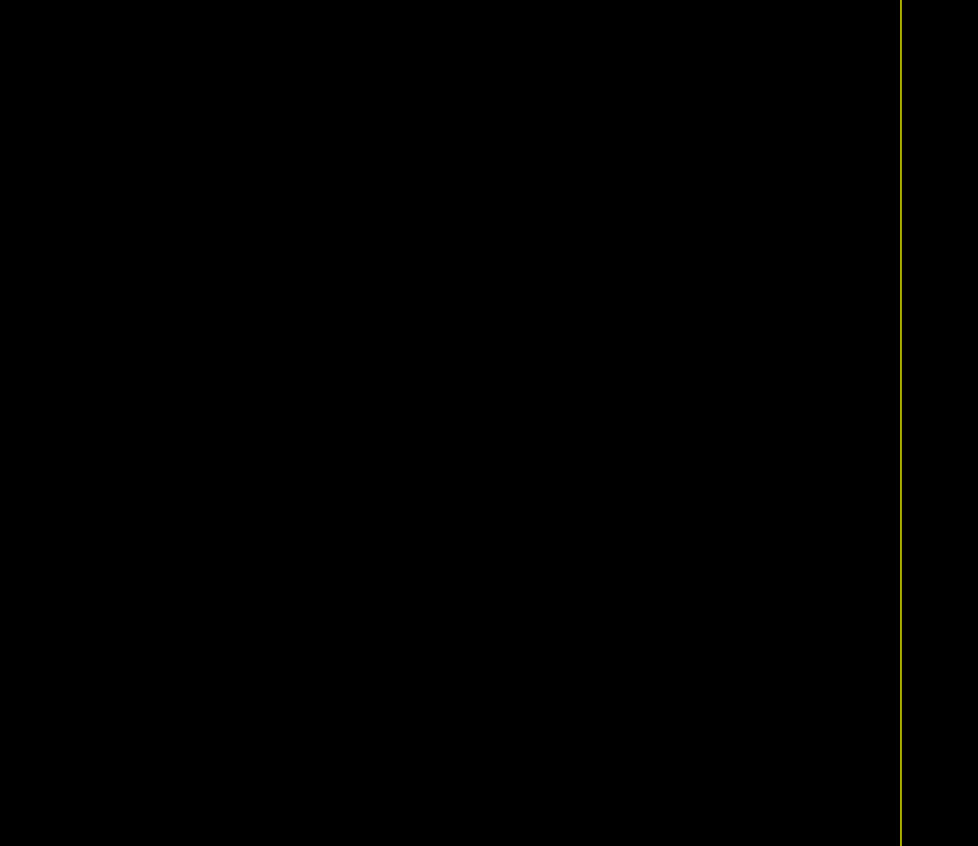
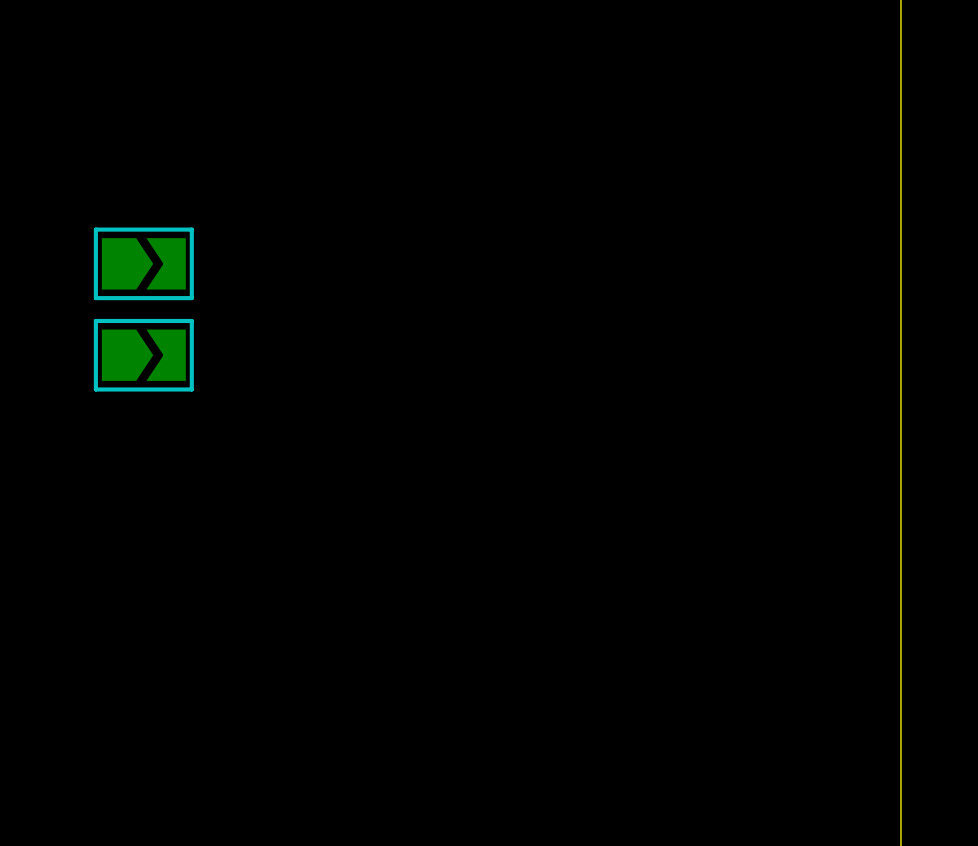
part: none -> (143, 263)
part: none -> (143, 355)

